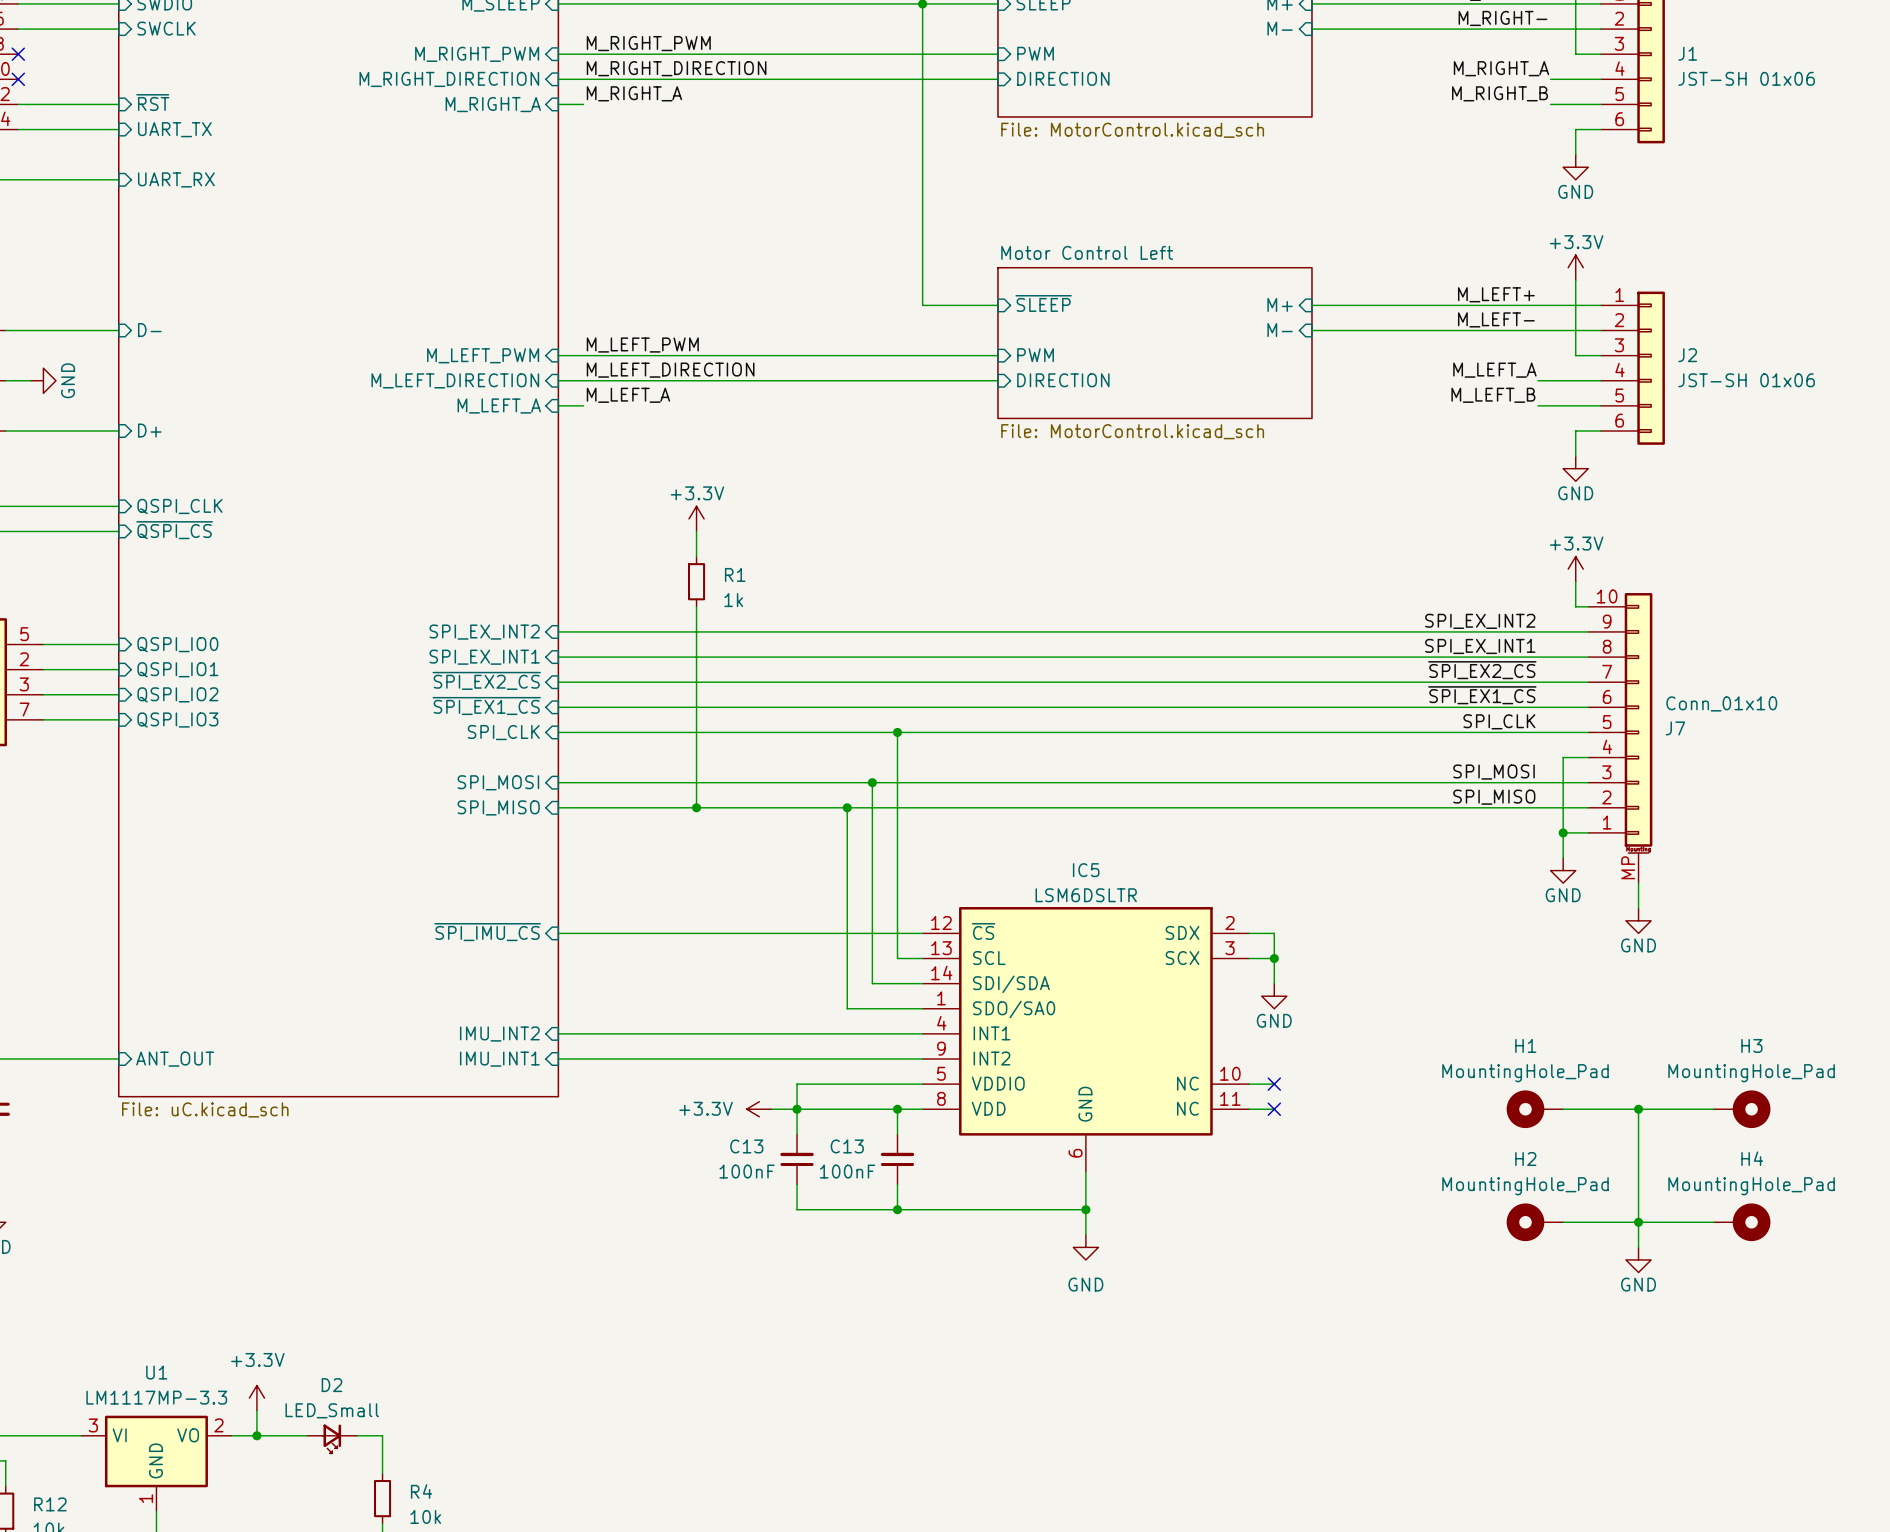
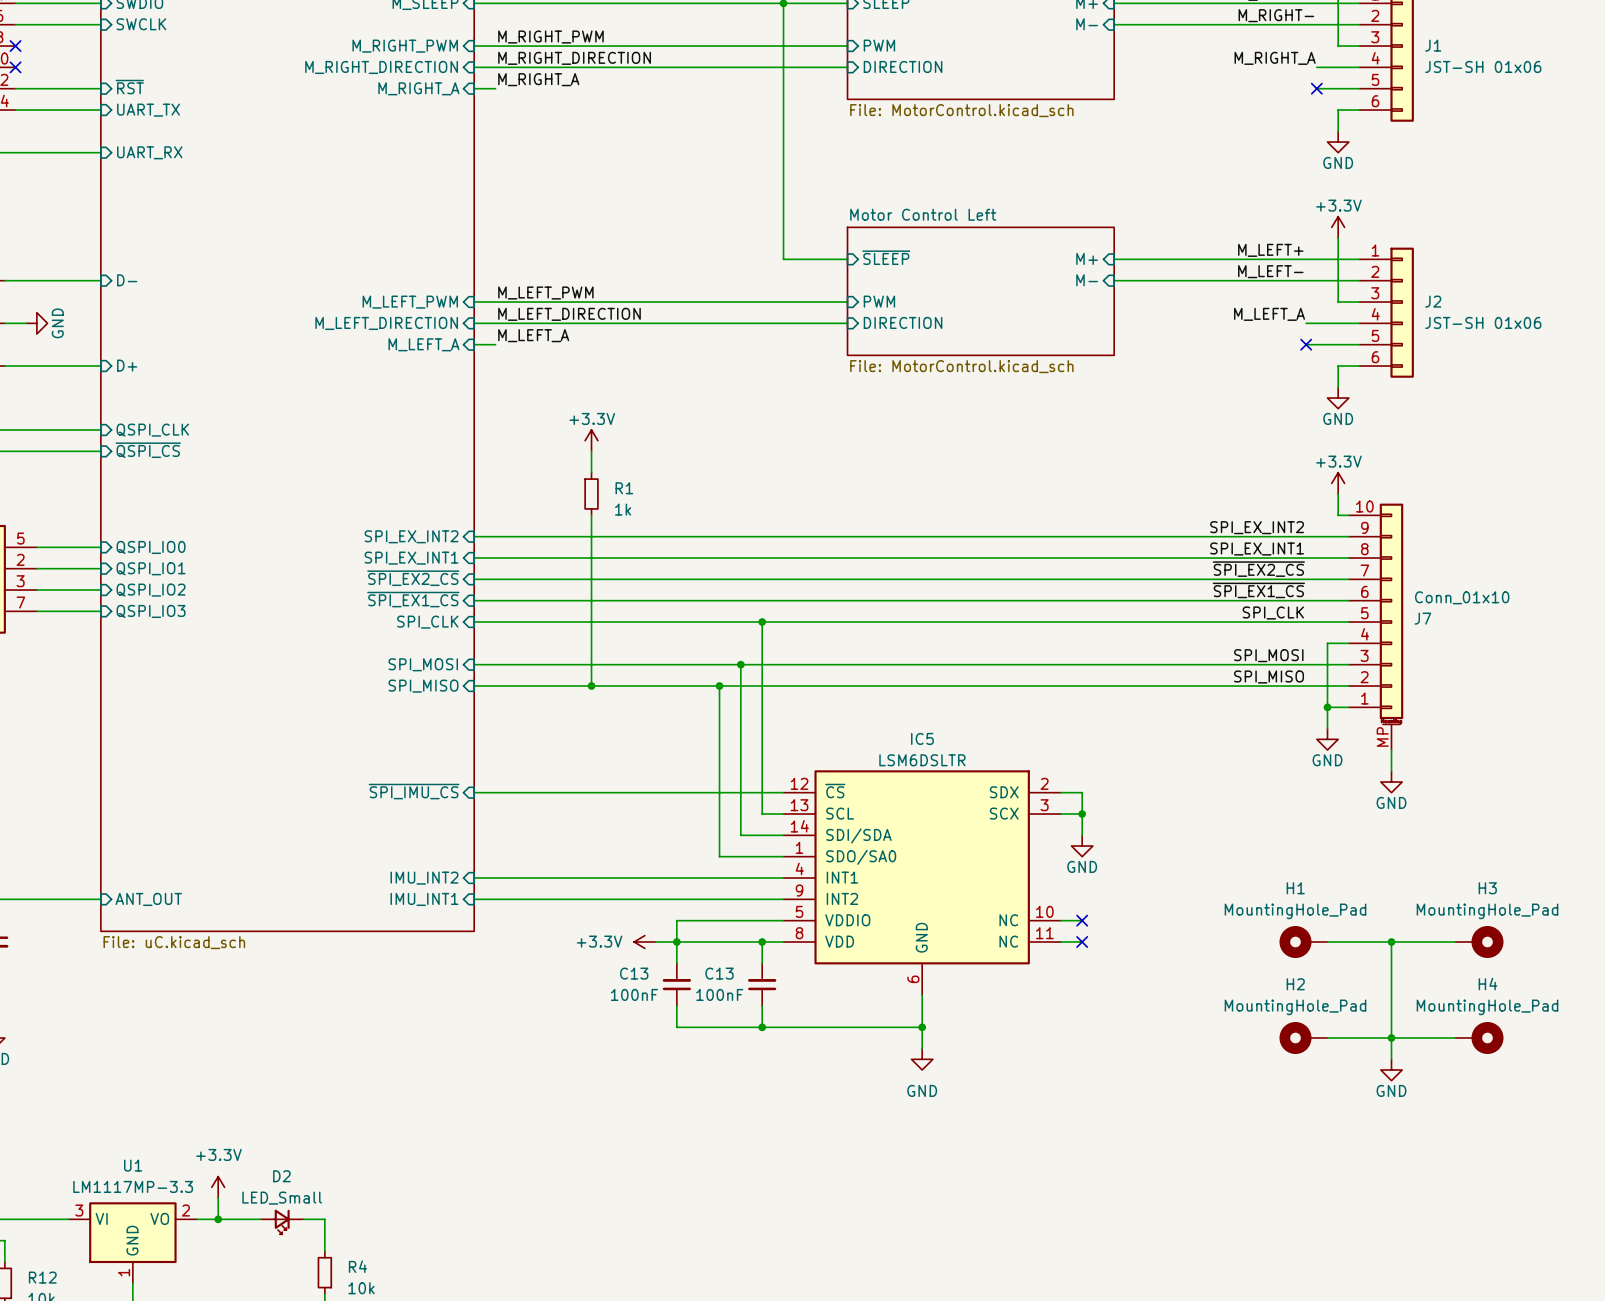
label: M_RIGHT_B (1499, 93) -> none
no-connect mark: none -> (1316, 88)
label: M_LEFT_B (1493, 395) -> none
no-connect mark: none -> (1306, 344)

